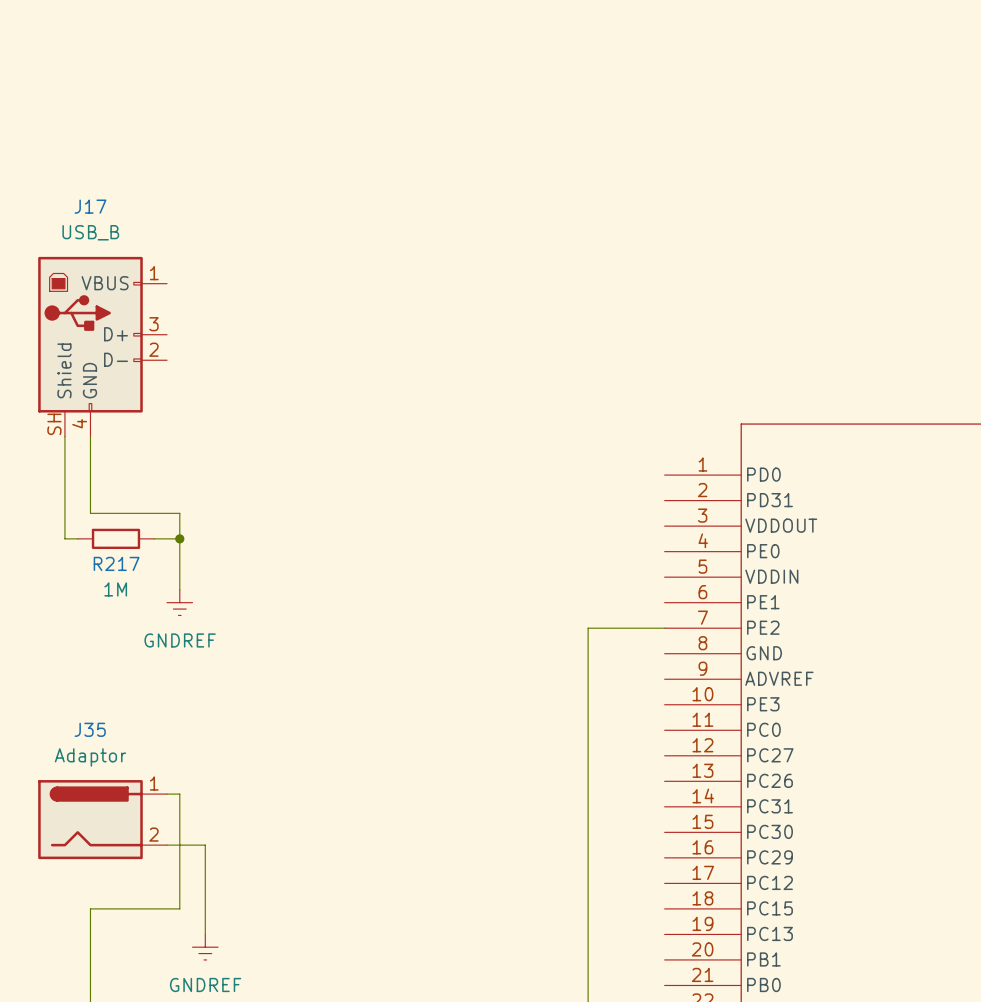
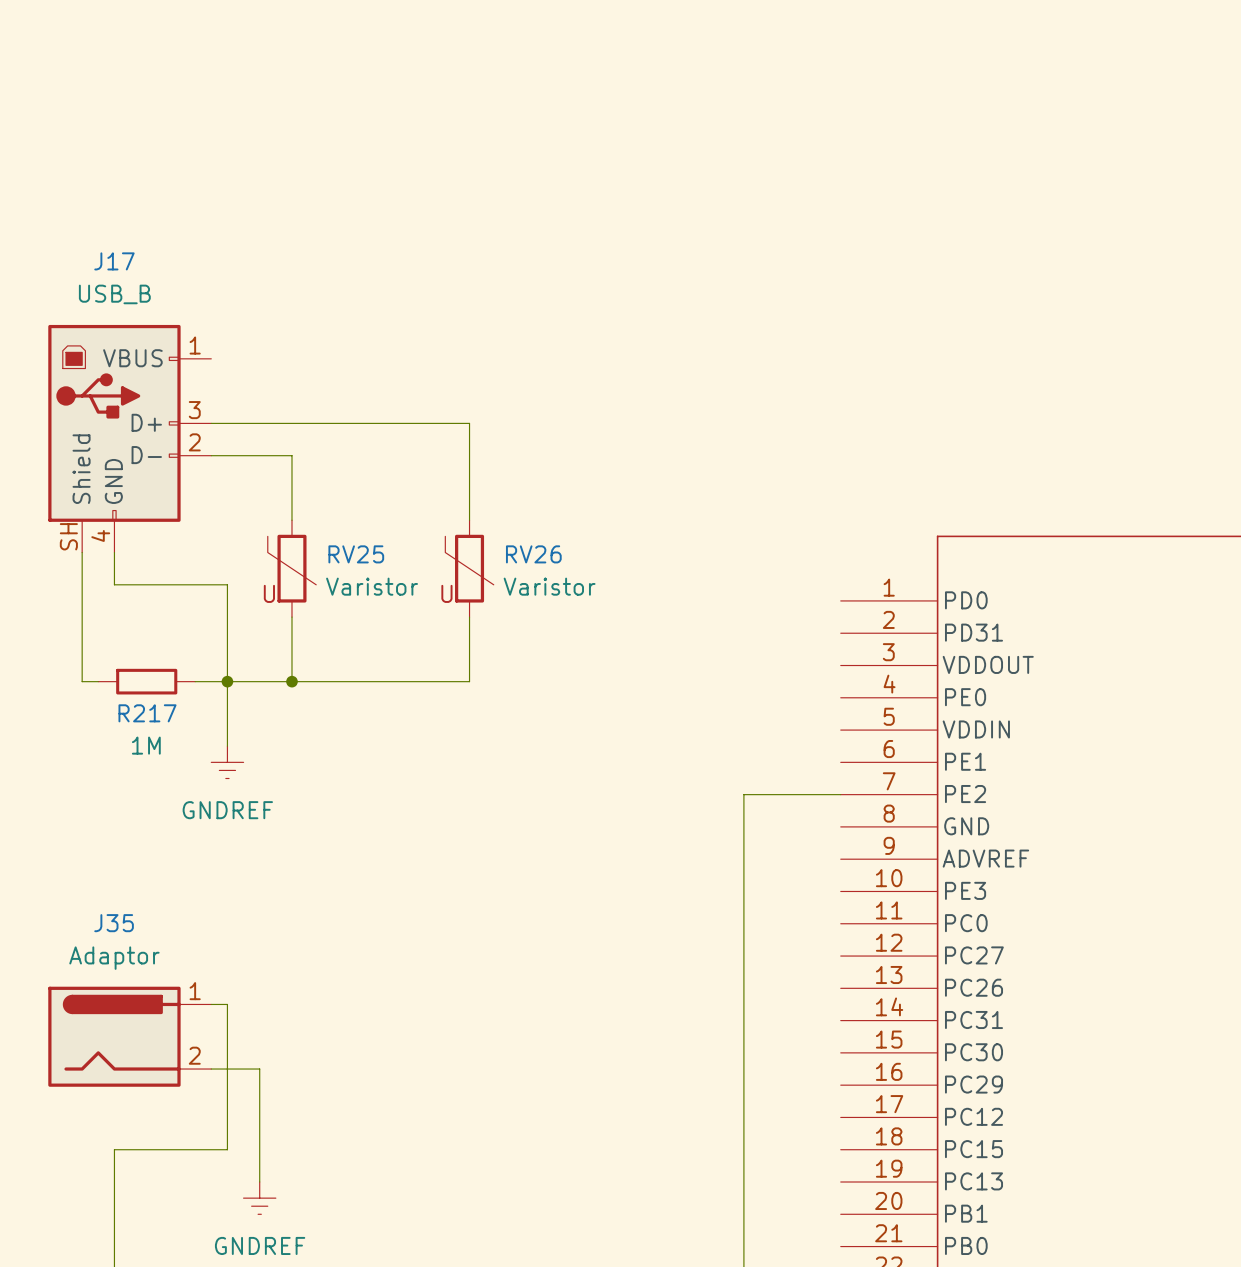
wire: none -> (211, 423) (469, 423) (469, 520)
wire: none -> (211, 455) (291, 455) (291, 520)
RV25: none -> Varistor (291, 568)
RV26: none -> Varistor (469, 568)
wire: (90, 462) (90, 513) (179, 513) -> (114, 584) (227, 584) (227, 649)
wire: none -> (291, 617) (291, 681)
wire: none -> (469, 617) (469, 681) (227, 681)
junction: none -> (291, 681)

